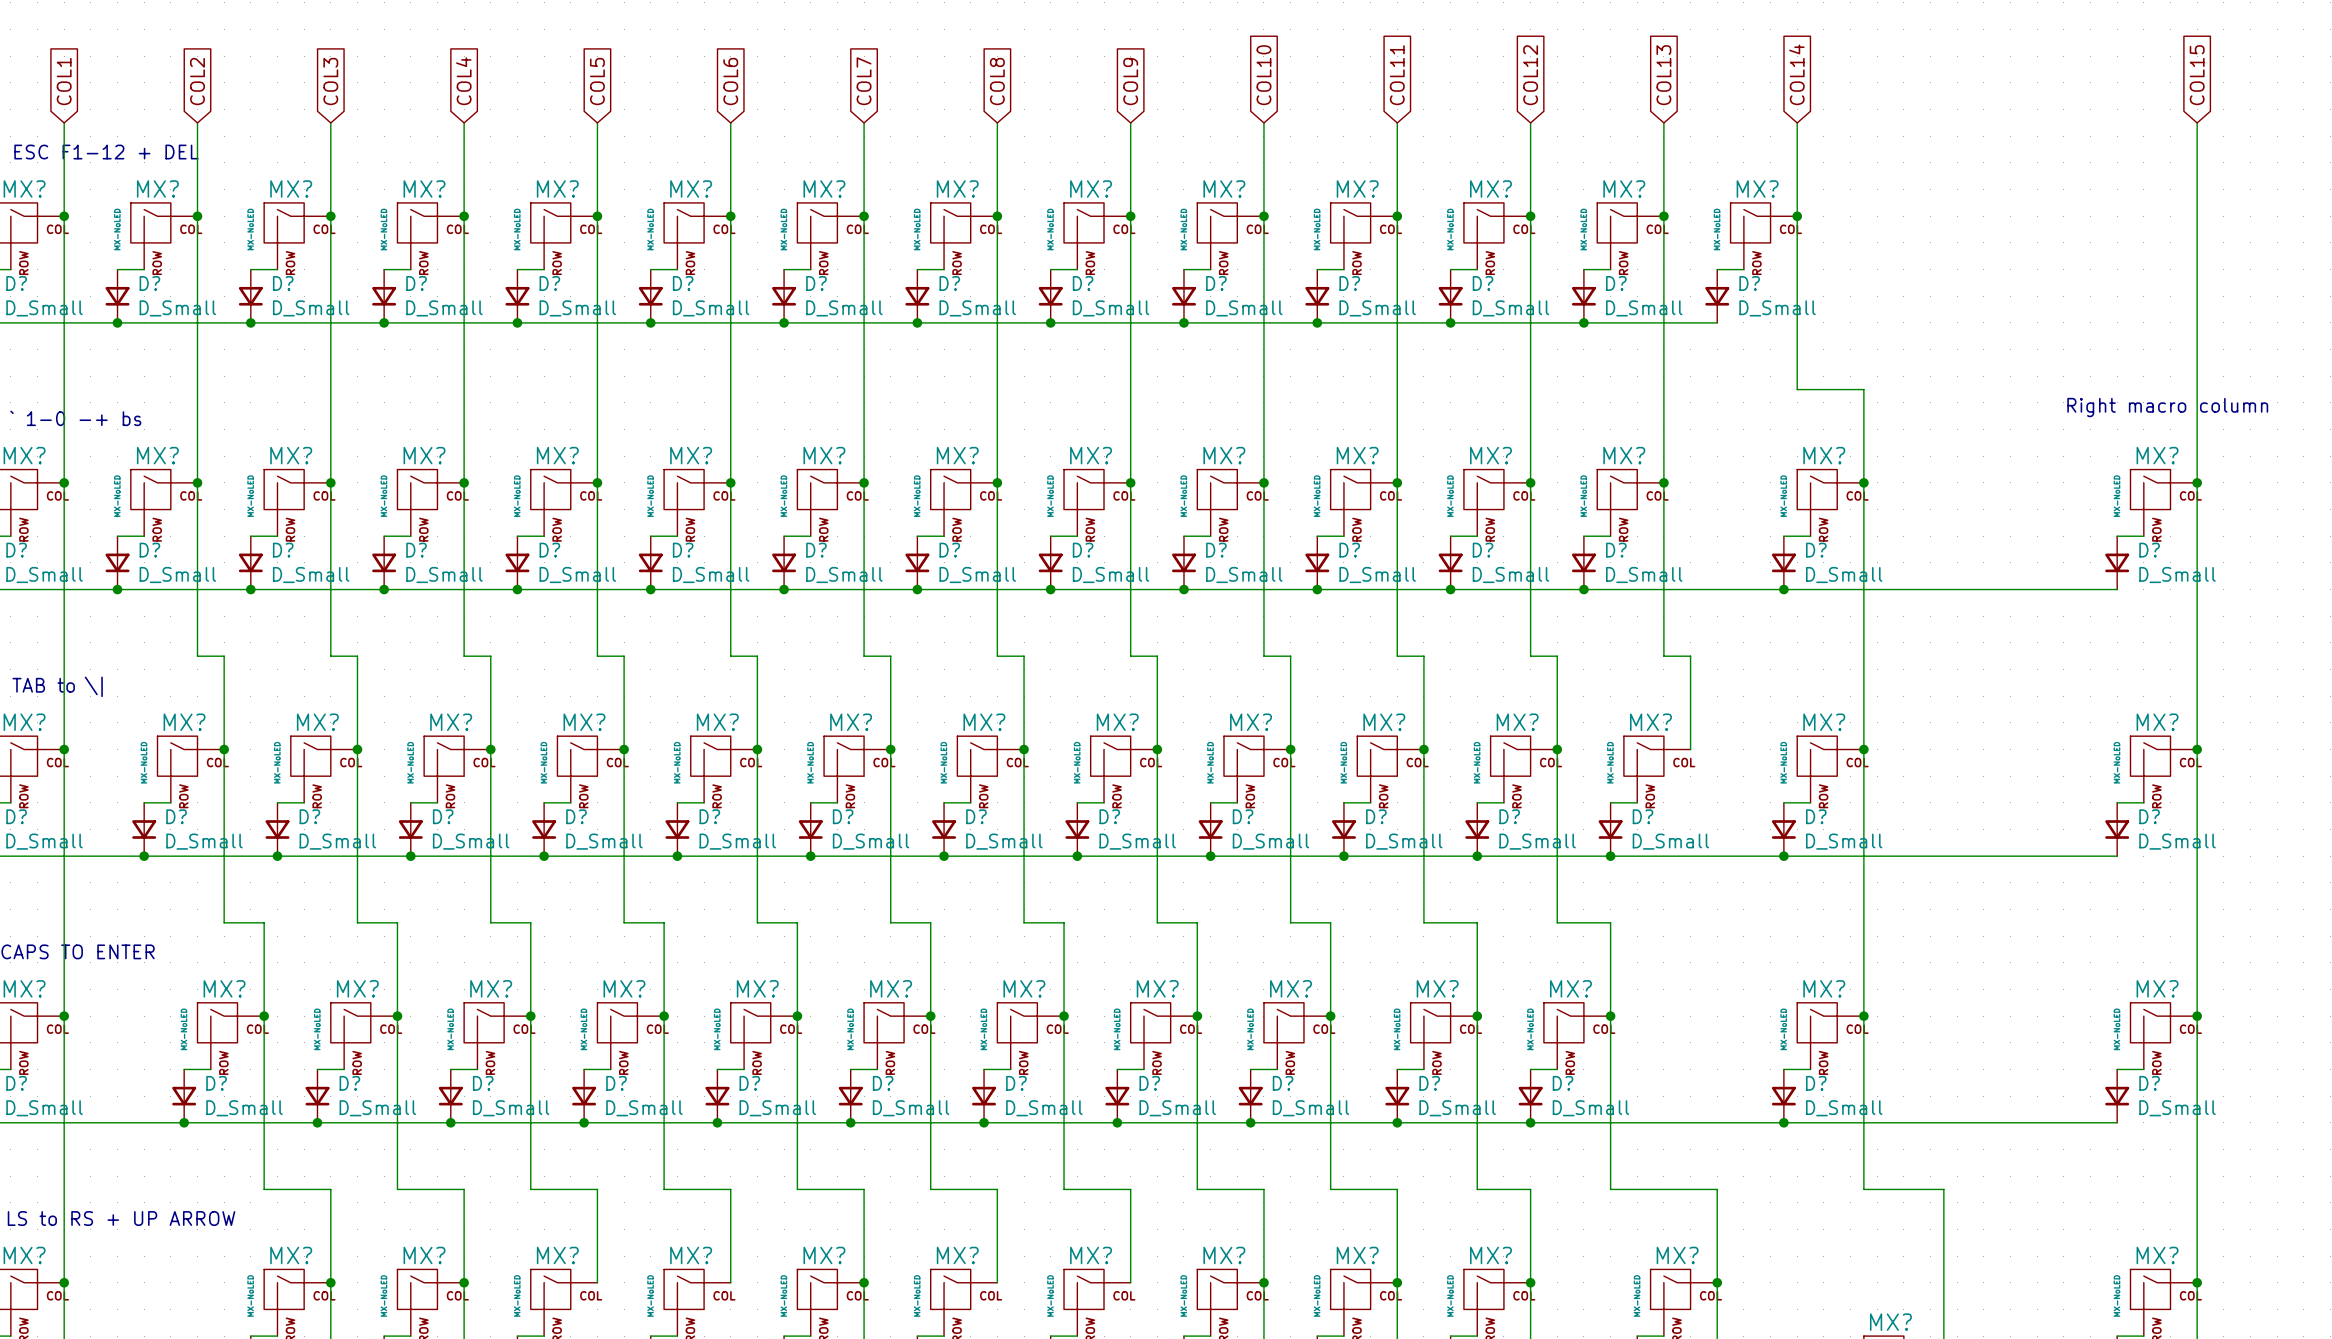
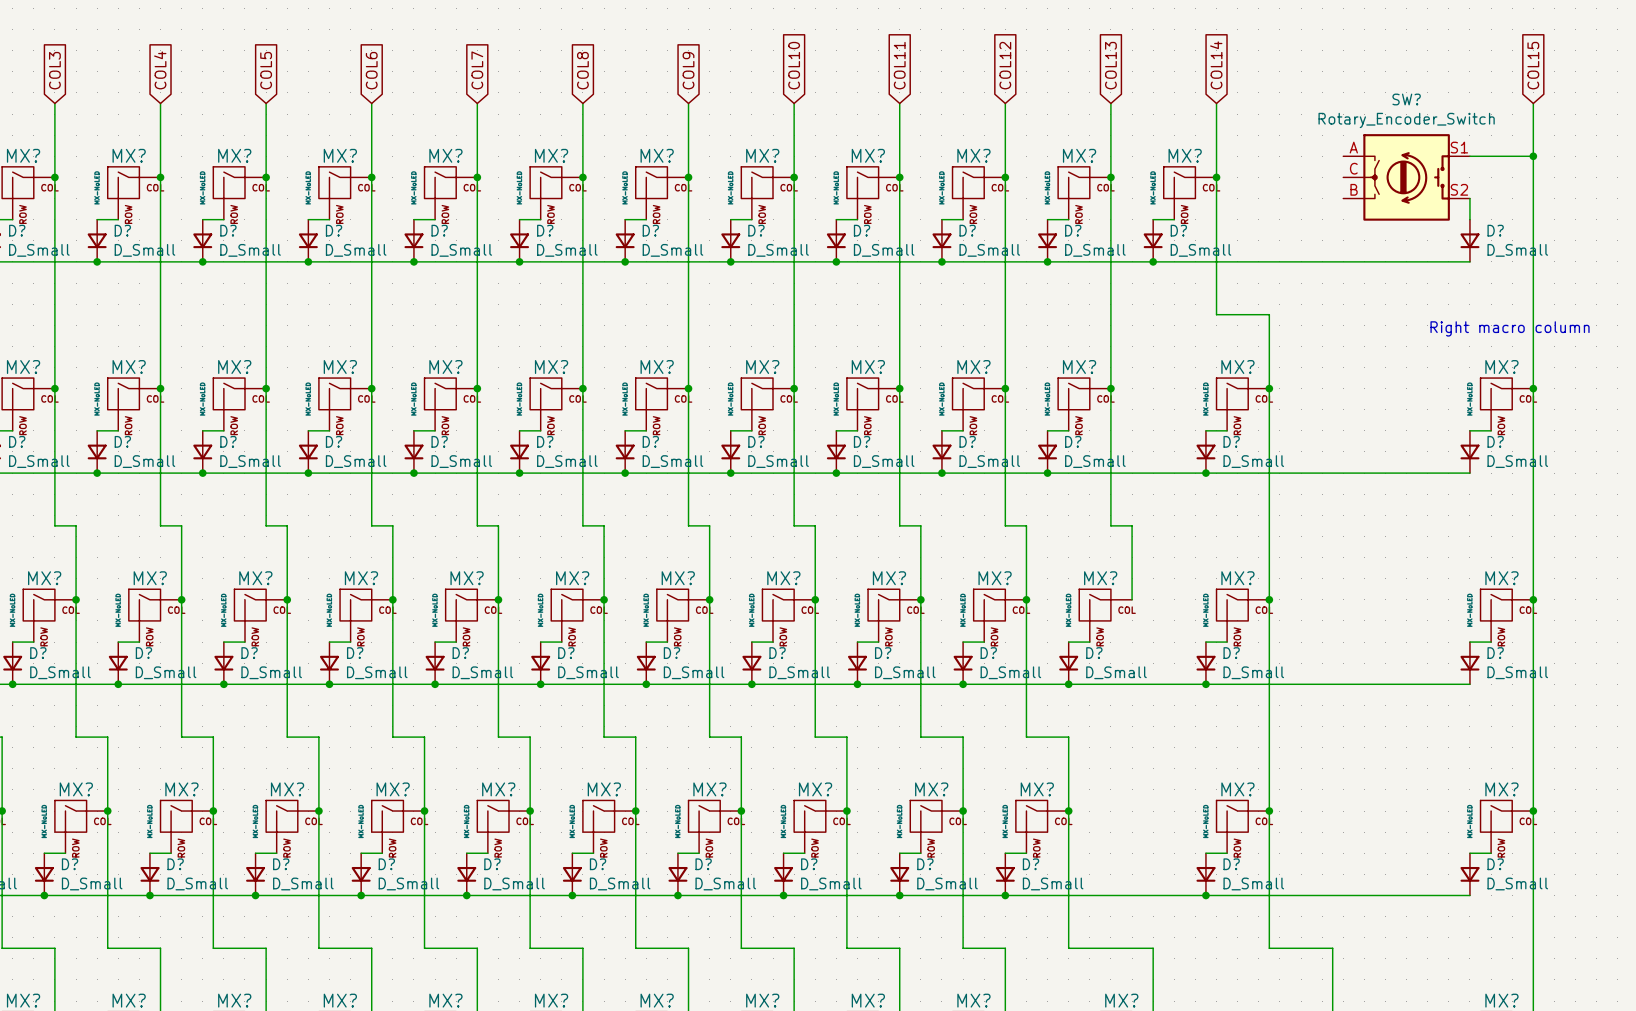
wire: none -> (1469, 156) (1533, 156)
junction: none -> (1533, 156)
SW?: none -> Rotary_Encoder_Switch (1406, 177)
wire: none -> (1469, 198) (1469, 219)
D?: none -> D_Small (1469, 240)
wire: none -> (1153, 261) (1469, 261)
junction: none -> (1153, 261)

